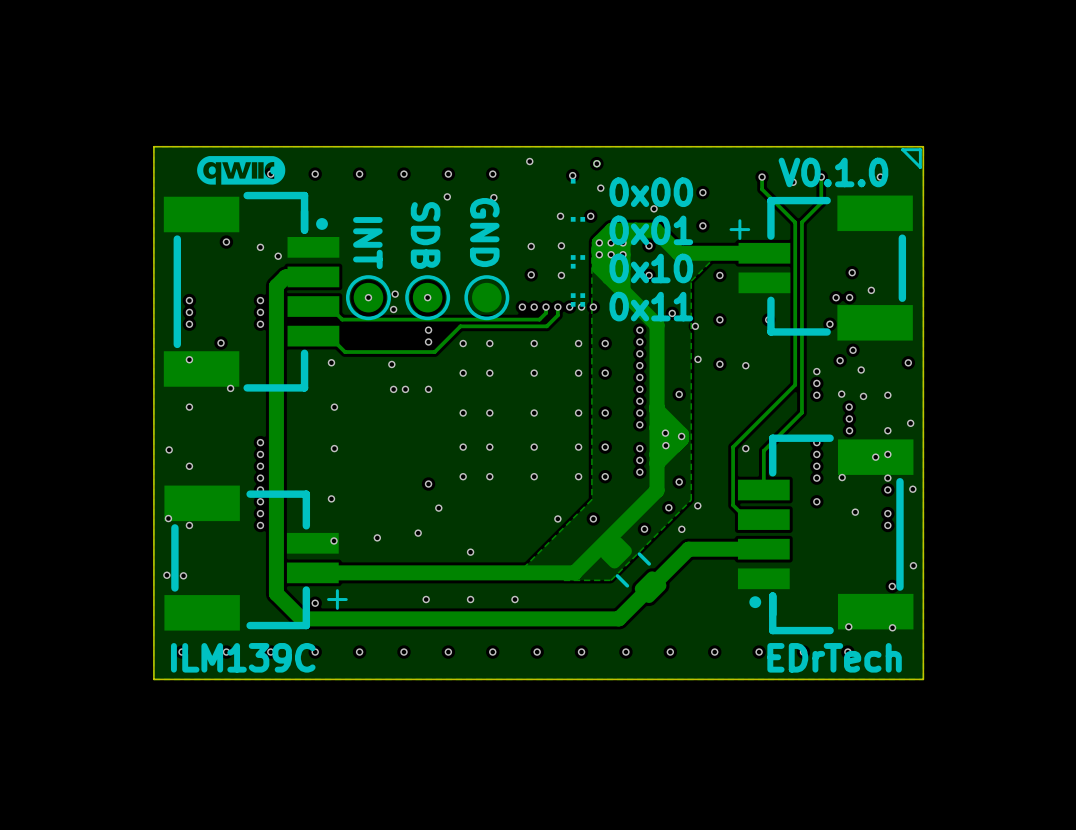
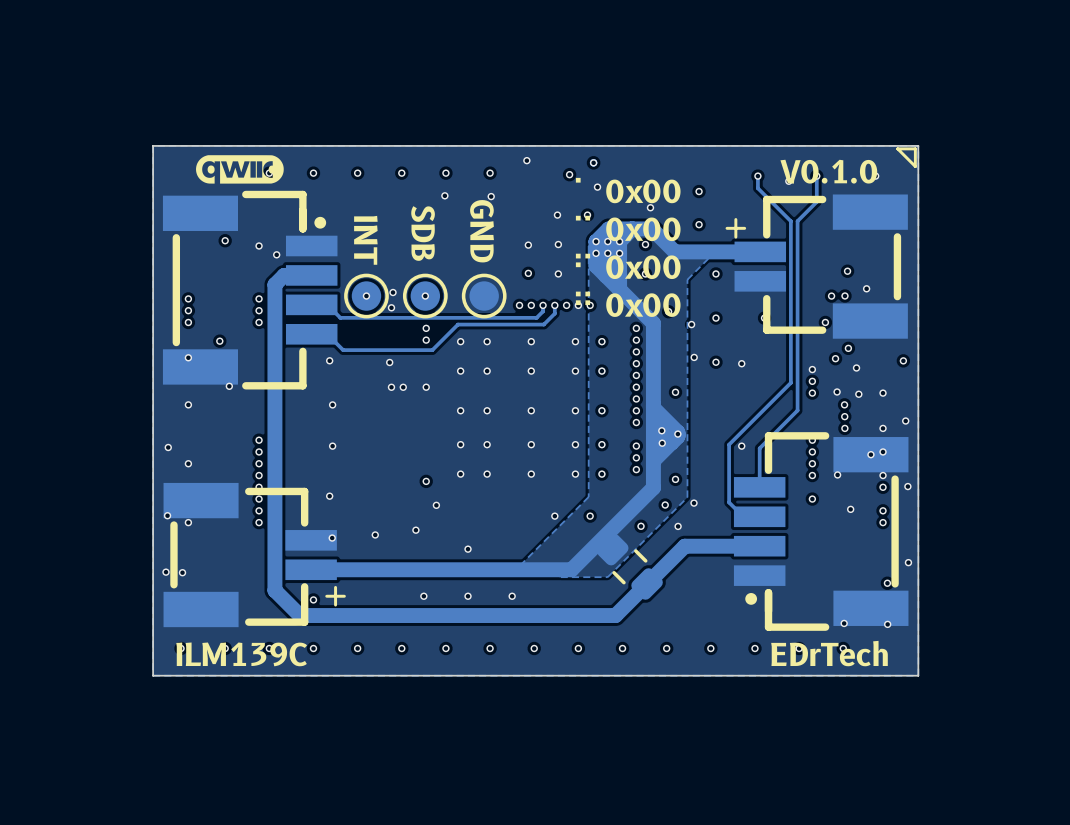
text: ⠉ 0x01 (630, 229) -> ⠉ 0x00 (628, 228)
text: ⠋ 0x10 (630, 267) -> ⠋ 0x00 (628, 266)
text: ⠛ 0x11 (630, 305) -> ⠛ 0x00 (628, 304)

